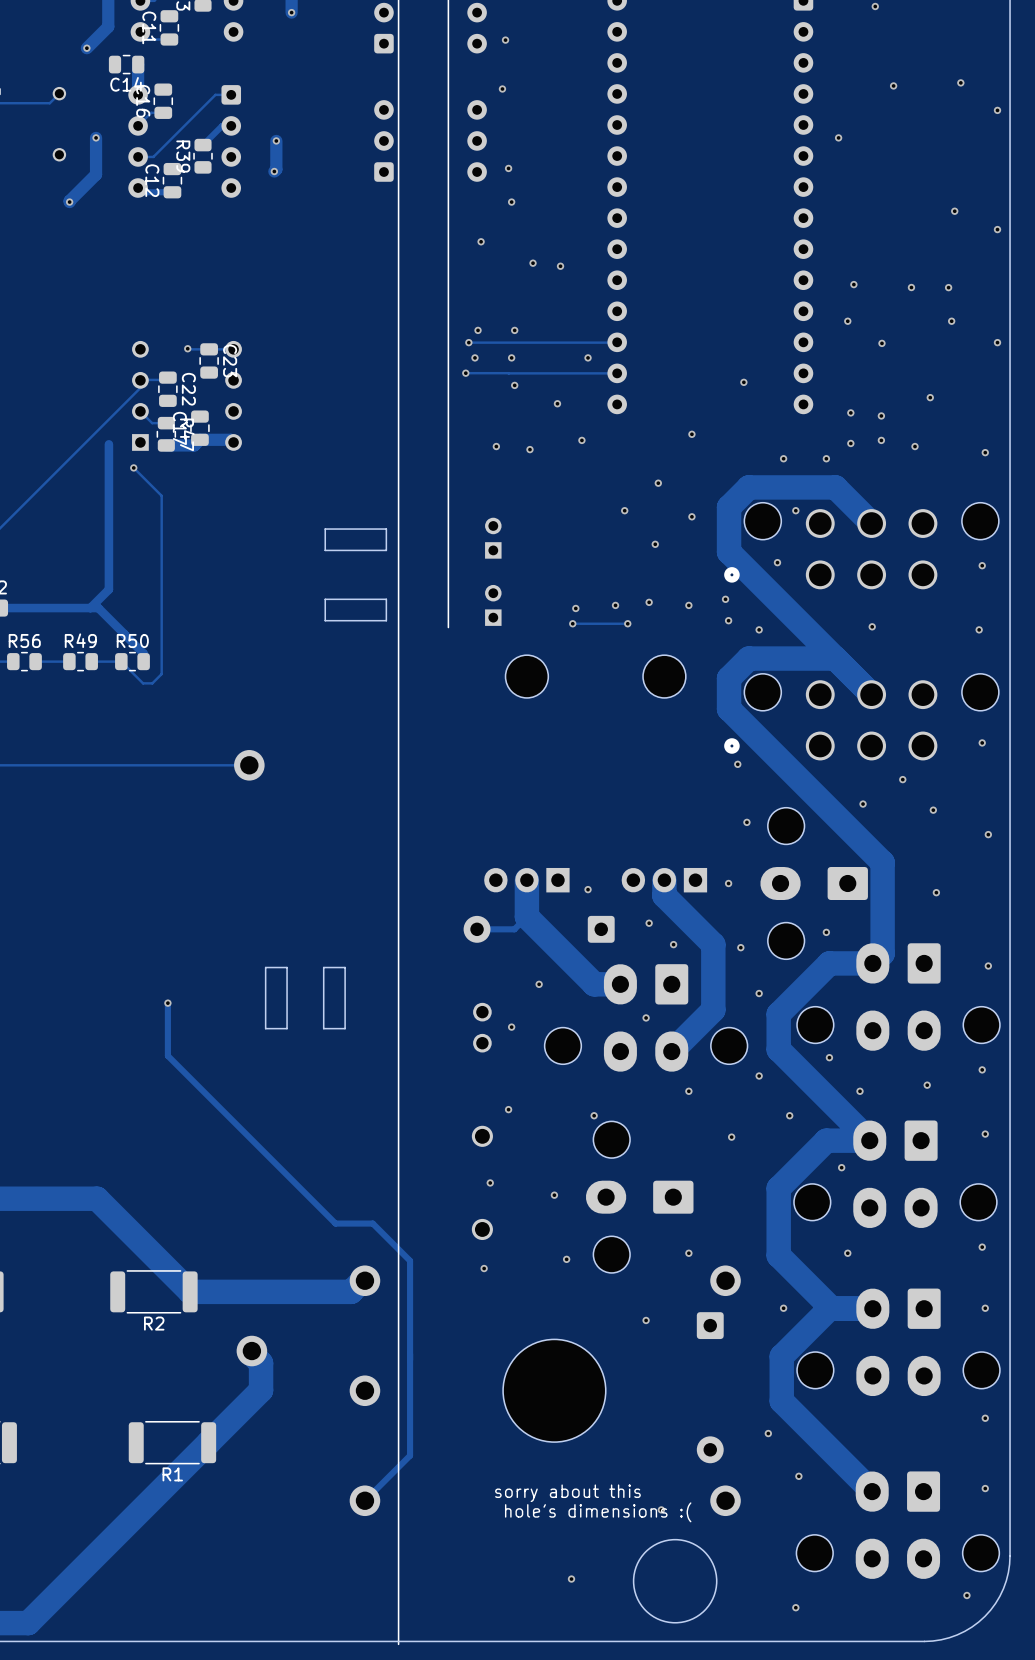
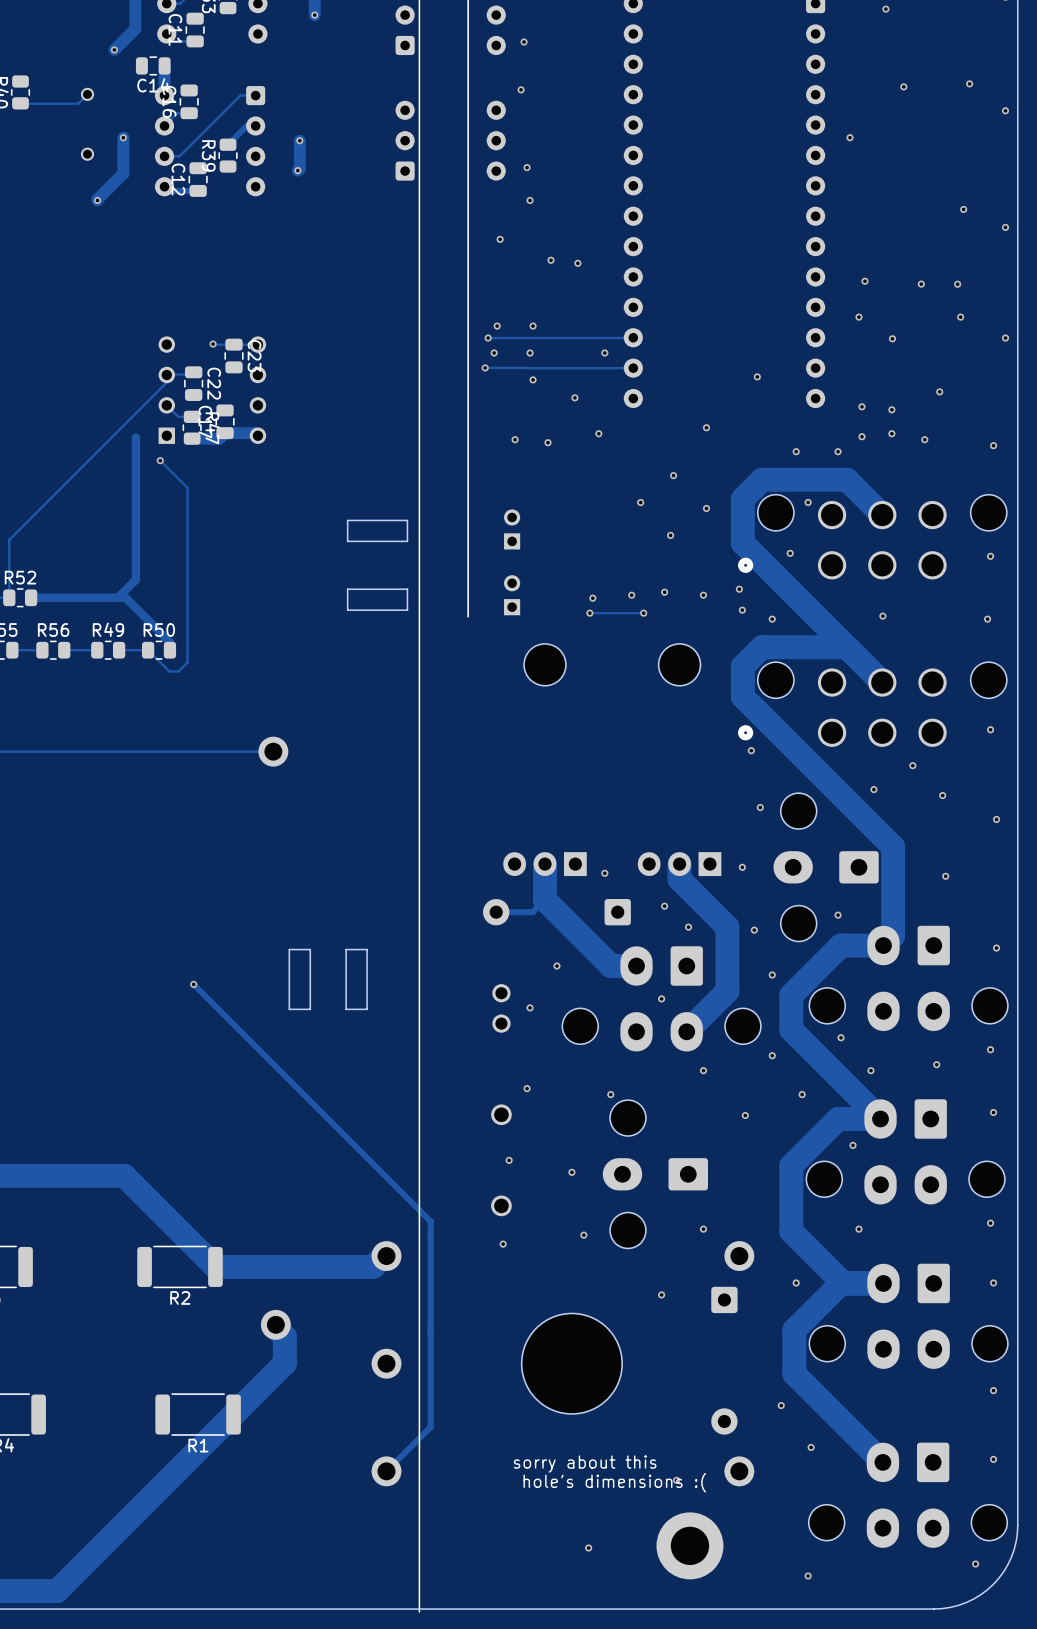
track: (167, 1003) (167, 1055) (335, 1223) (372, 1223) (410, 1260) -> (193, 984) (430, 1221) (430, 1236)
round board edge: [632, 1539, 718, 1624] -> none
part: none -> (689, 1545)

